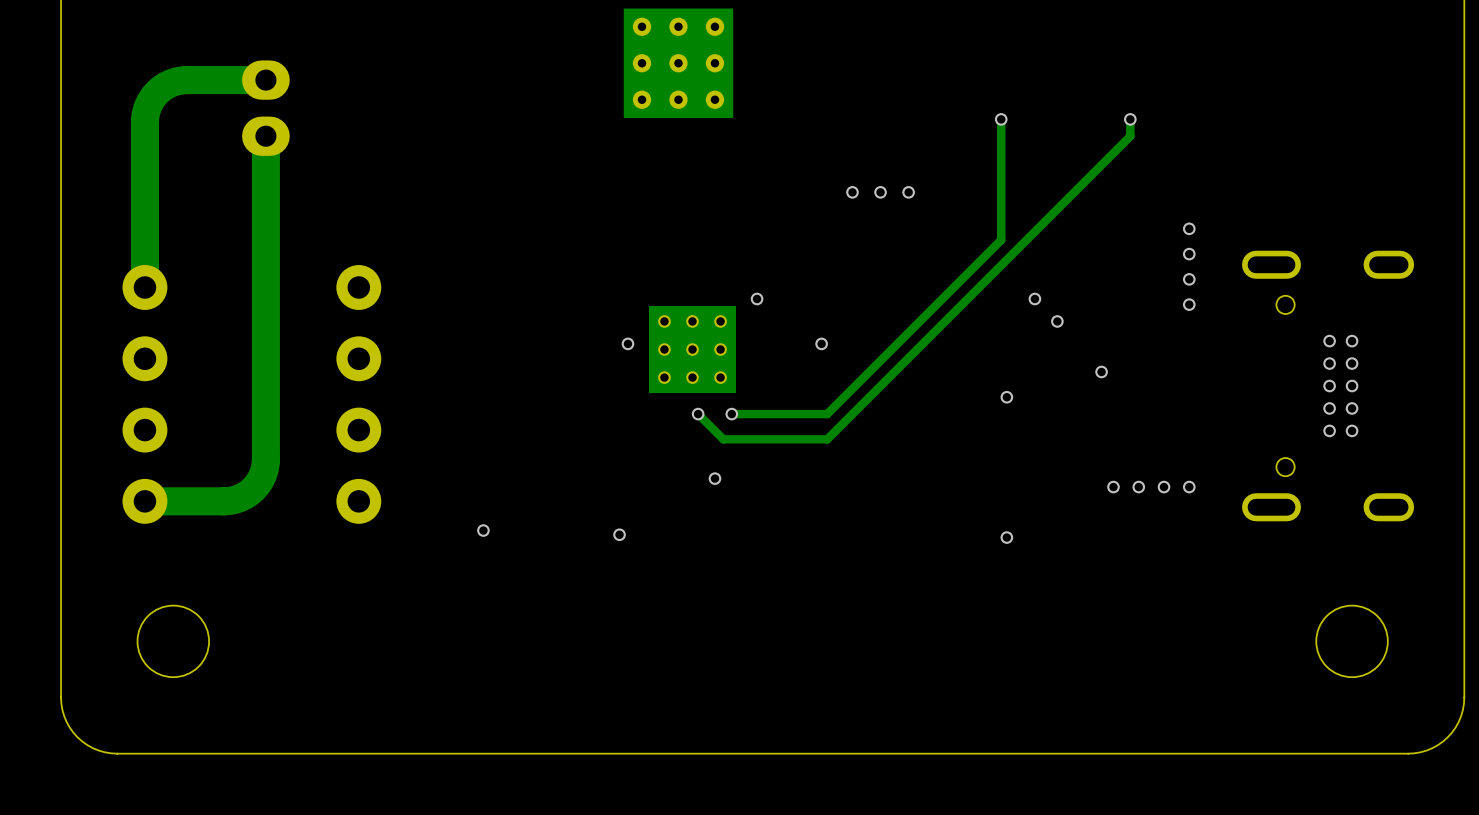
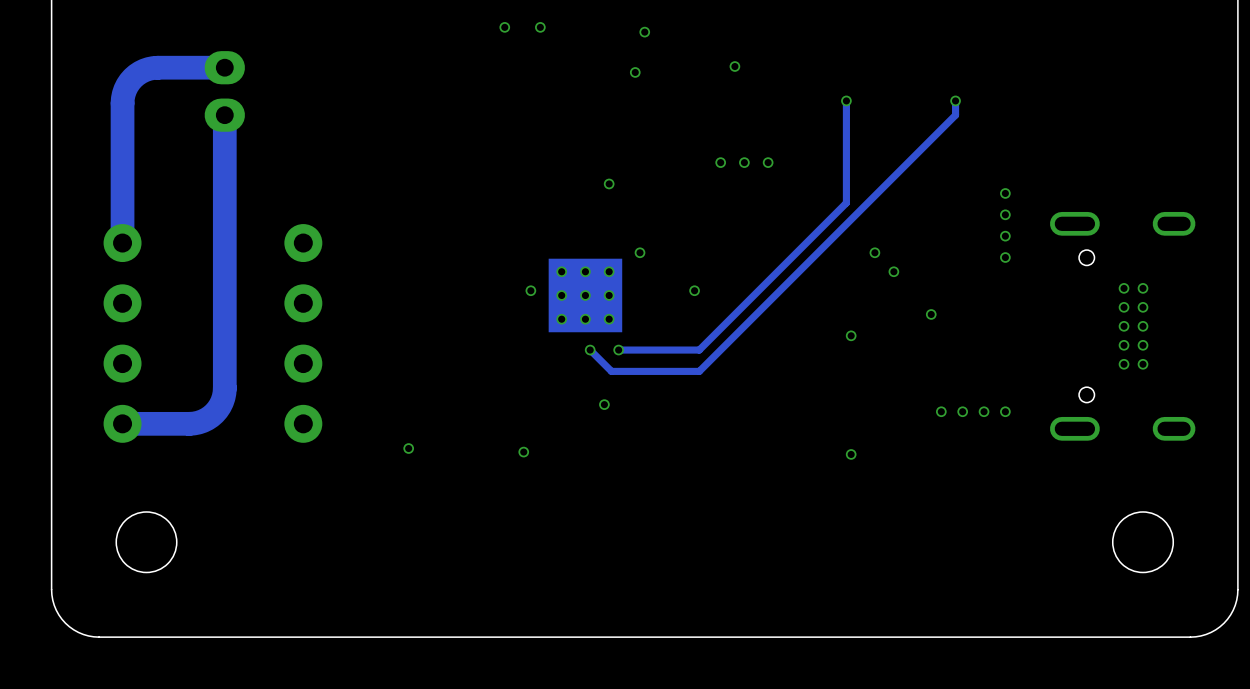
via: none -> (504, 27)
via: none -> (540, 27)
via: none -> (644, 32)
part: (678, 63) -> none
via: none -> (734, 66)
via: none -> (635, 72)
via: none -> (609, 183)

